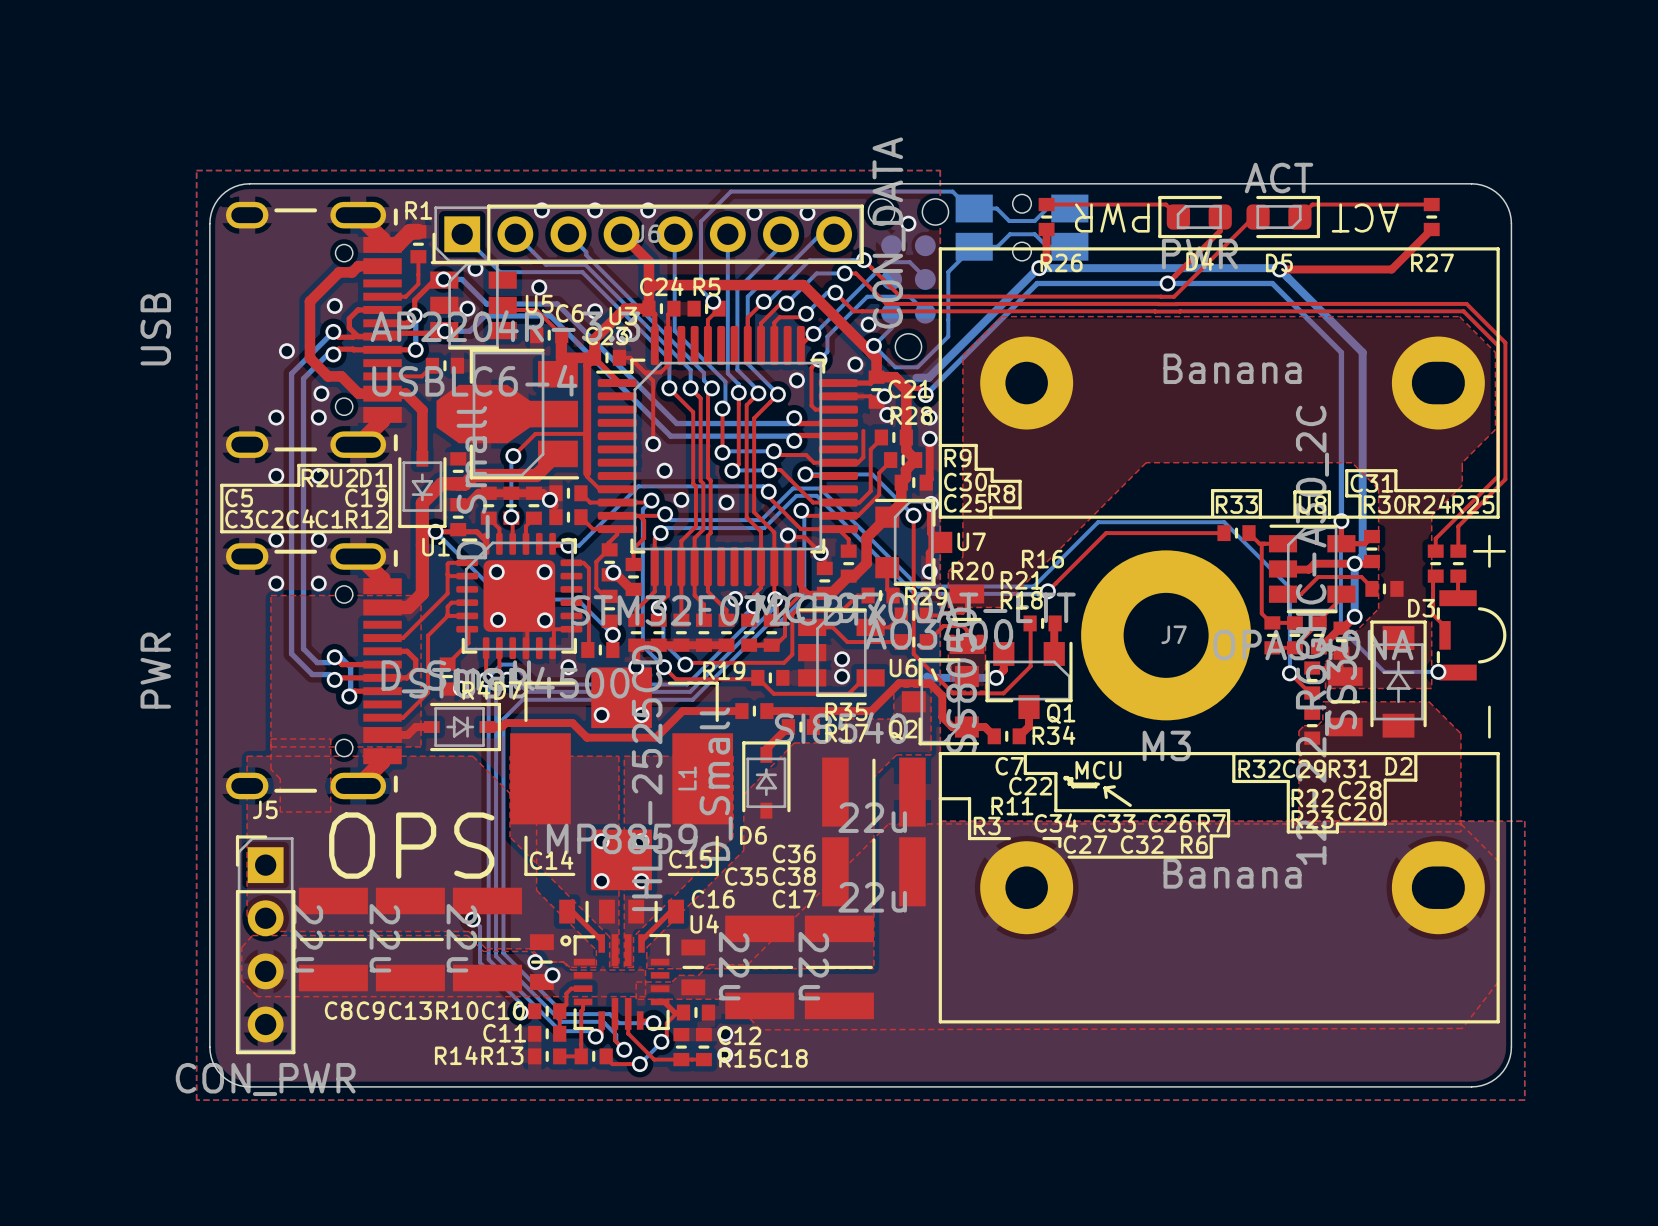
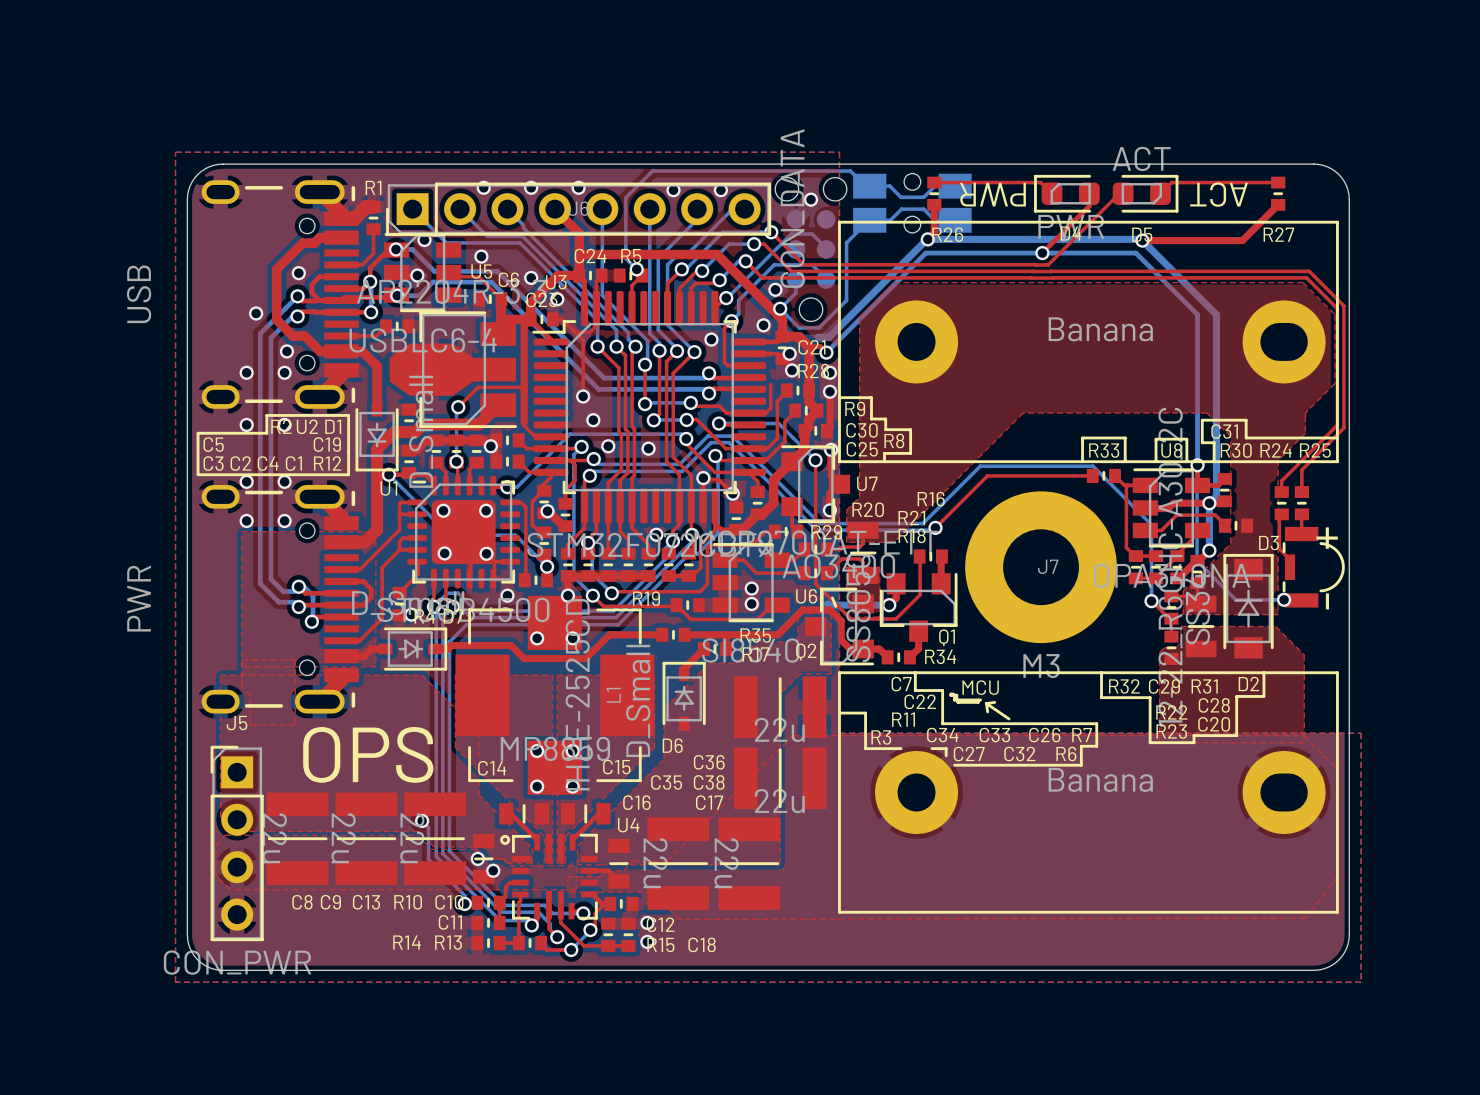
top track: none -> (589, 870) (608, 870) (618, 881)

